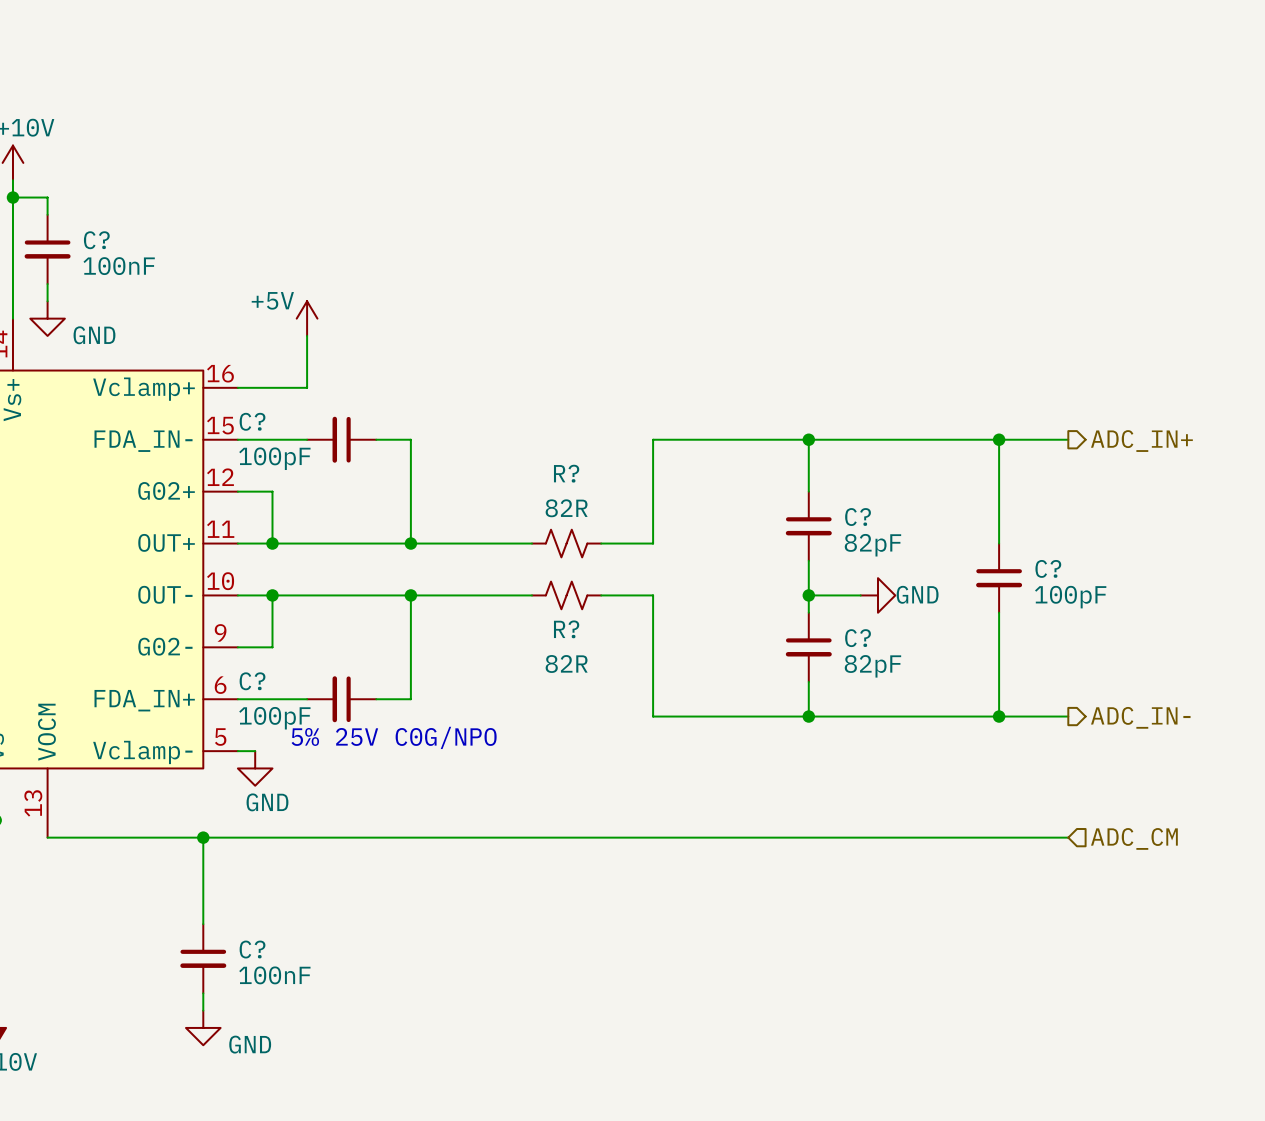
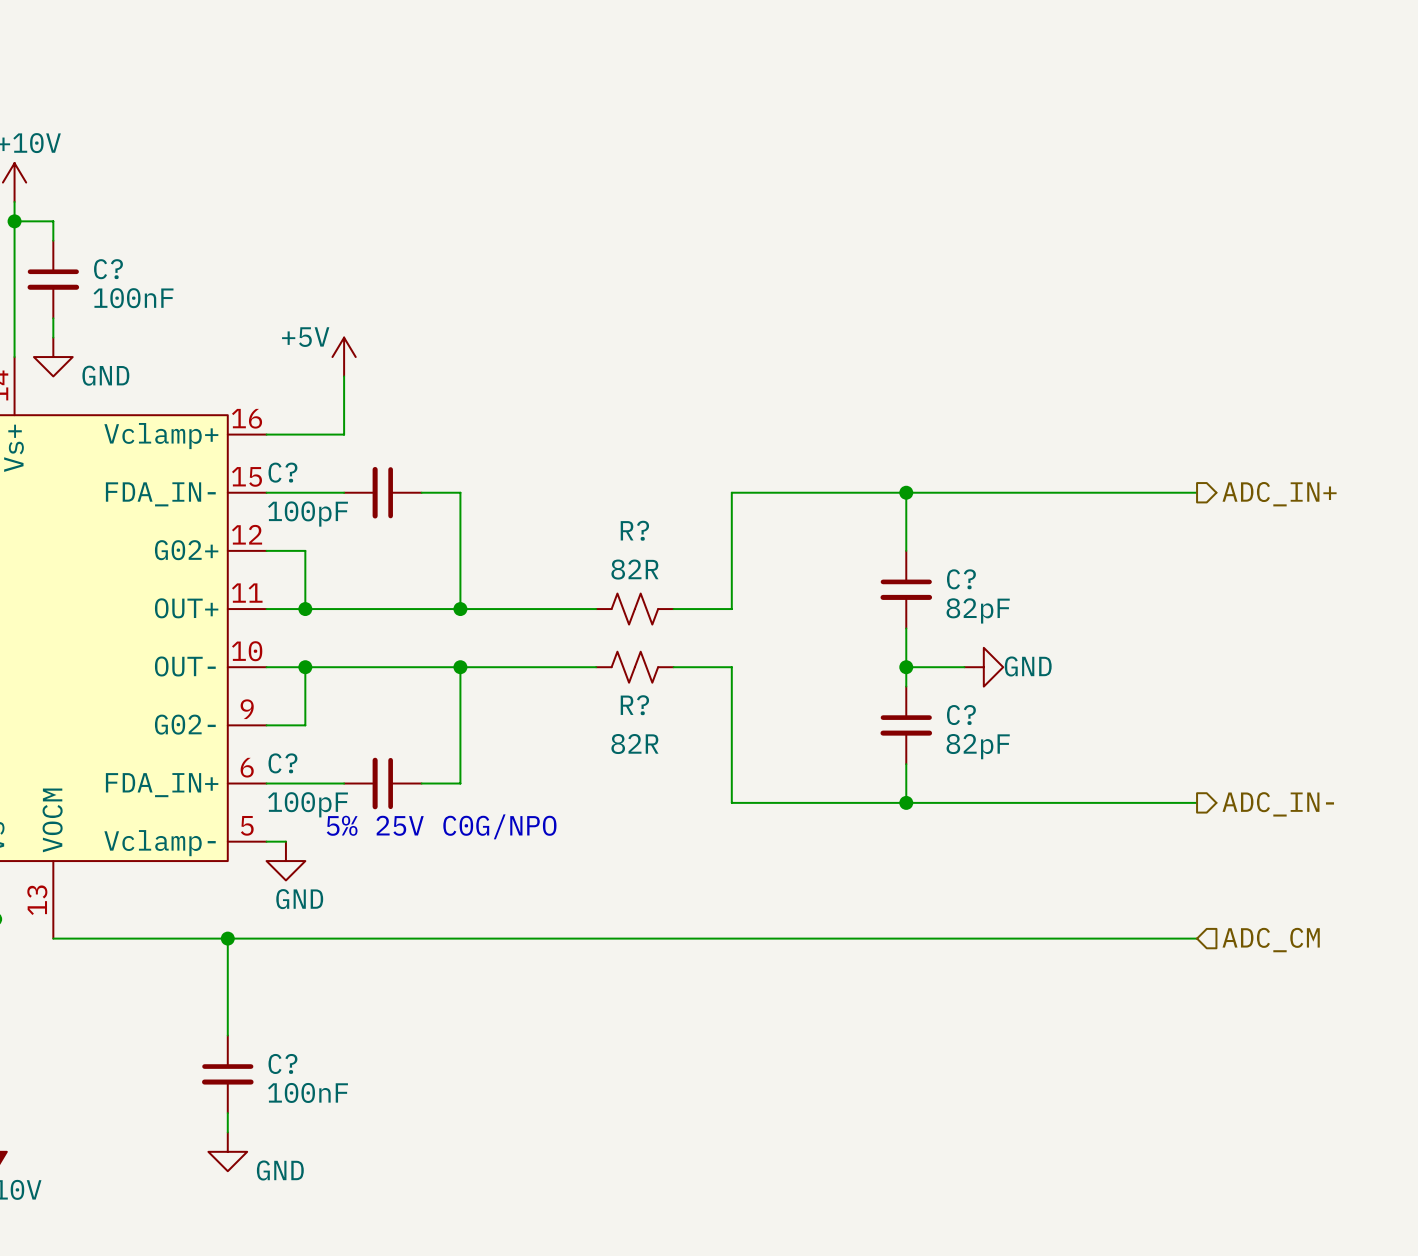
wire: (999, 439) (999, 543) -> none
junction: (999, 439) -> none
C?: 100pF (999, 578) -> none
wire: (999, 612) (999, 716) -> none
junction: (999, 716) -> none

